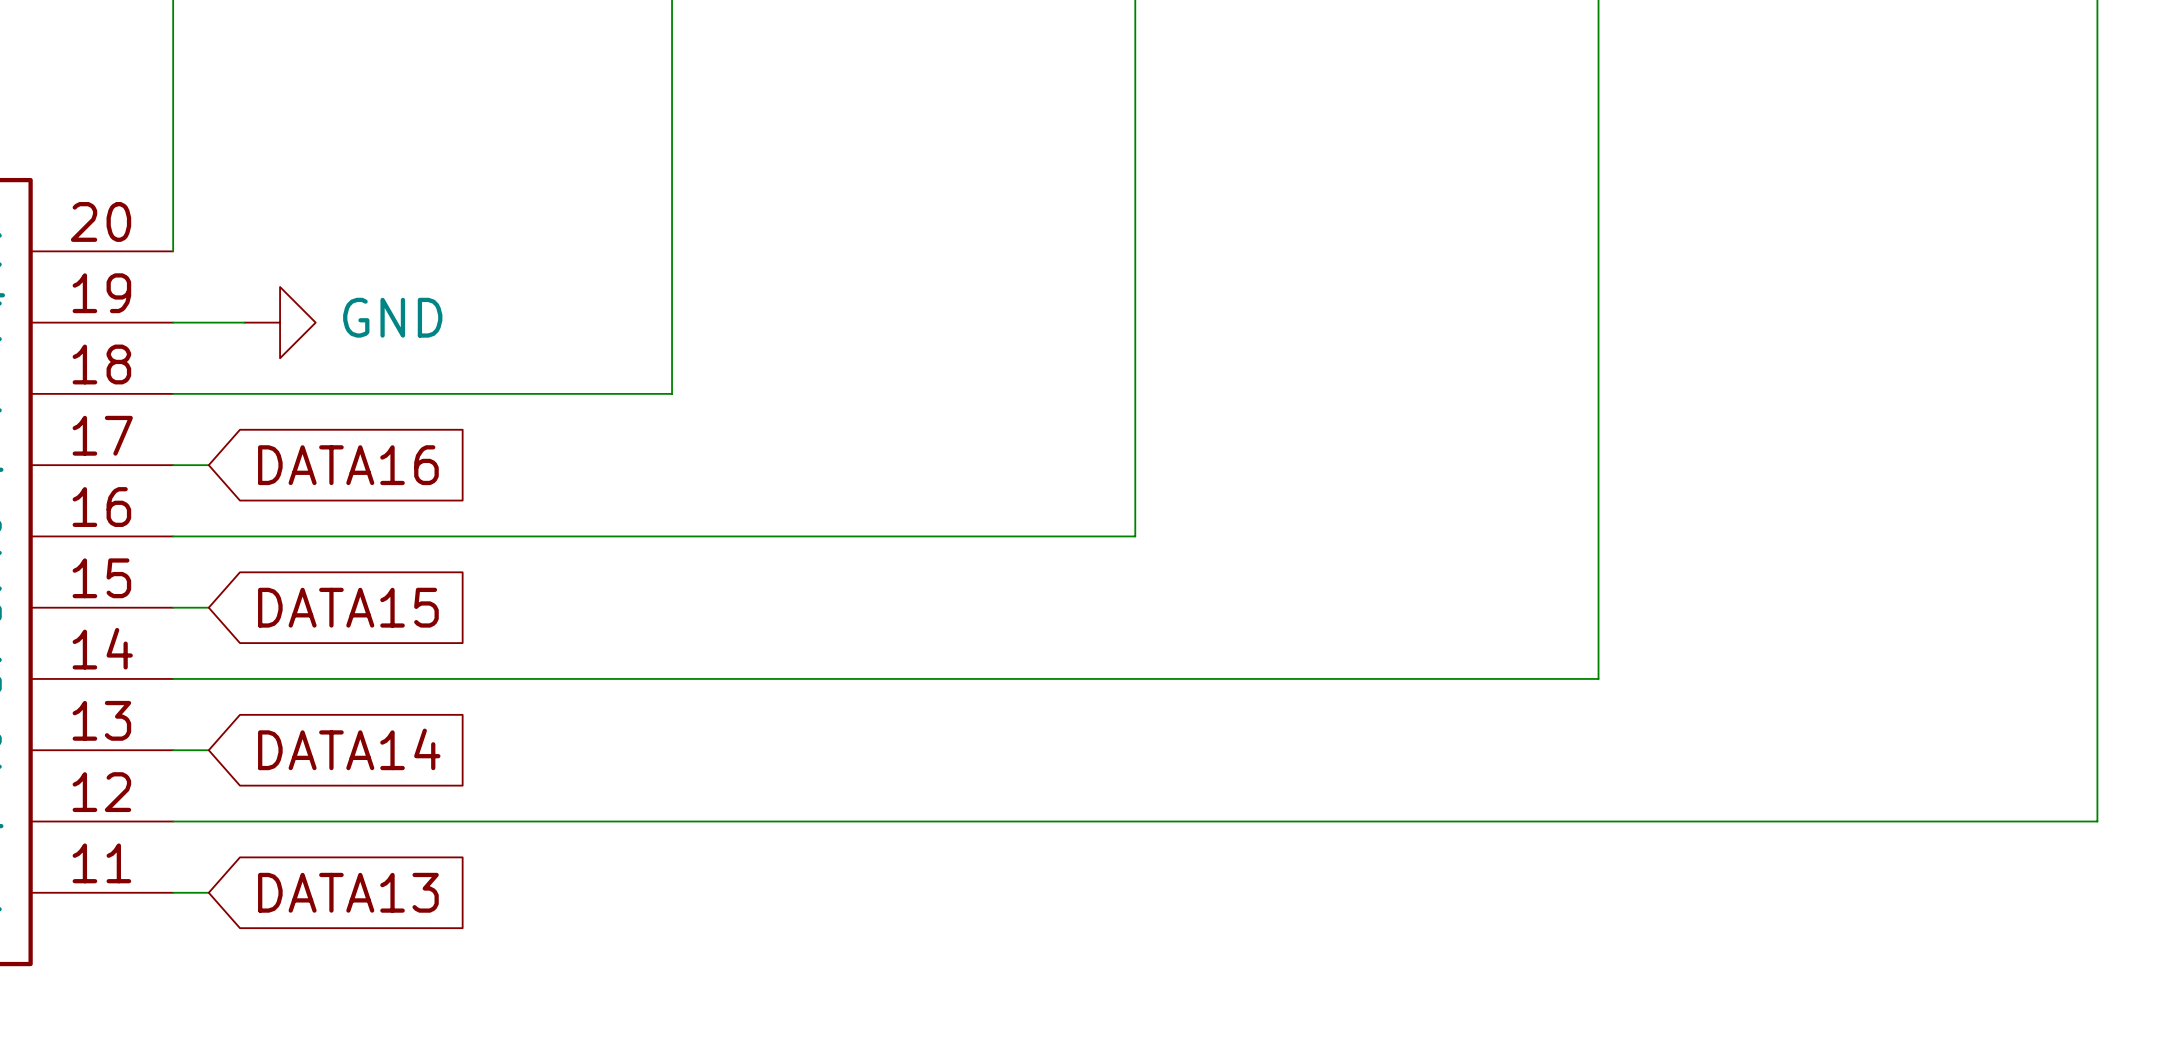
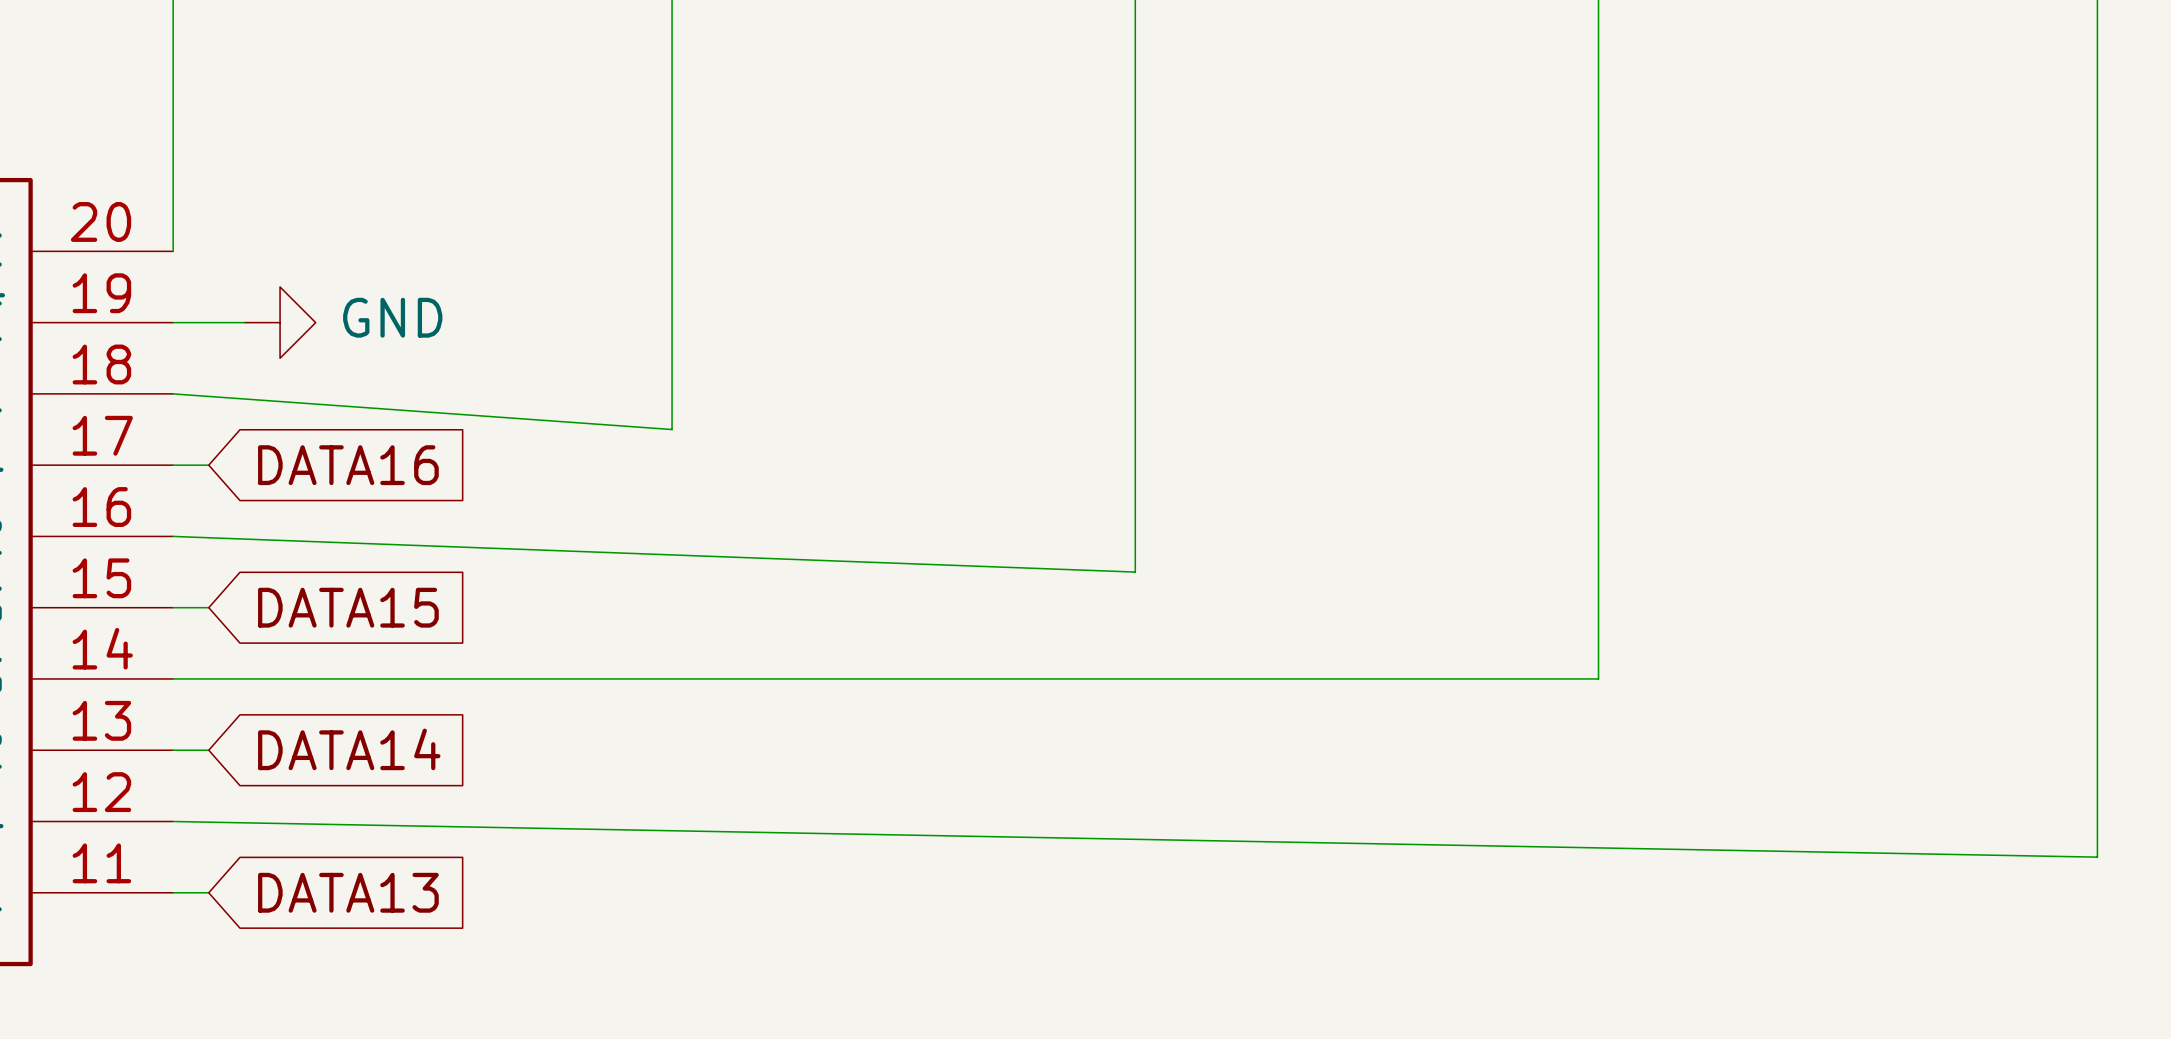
wire: (173, 393) (672, 393) -> (173, 393) (672, 429) (672, 393)
wire: (173, 536) (1135, 536) -> (173, 536) (1135, 572) (1135, 536)
wire: (173, 821) (2097, 821) -> (173, 821) (2097, 857) (2097, 821)

